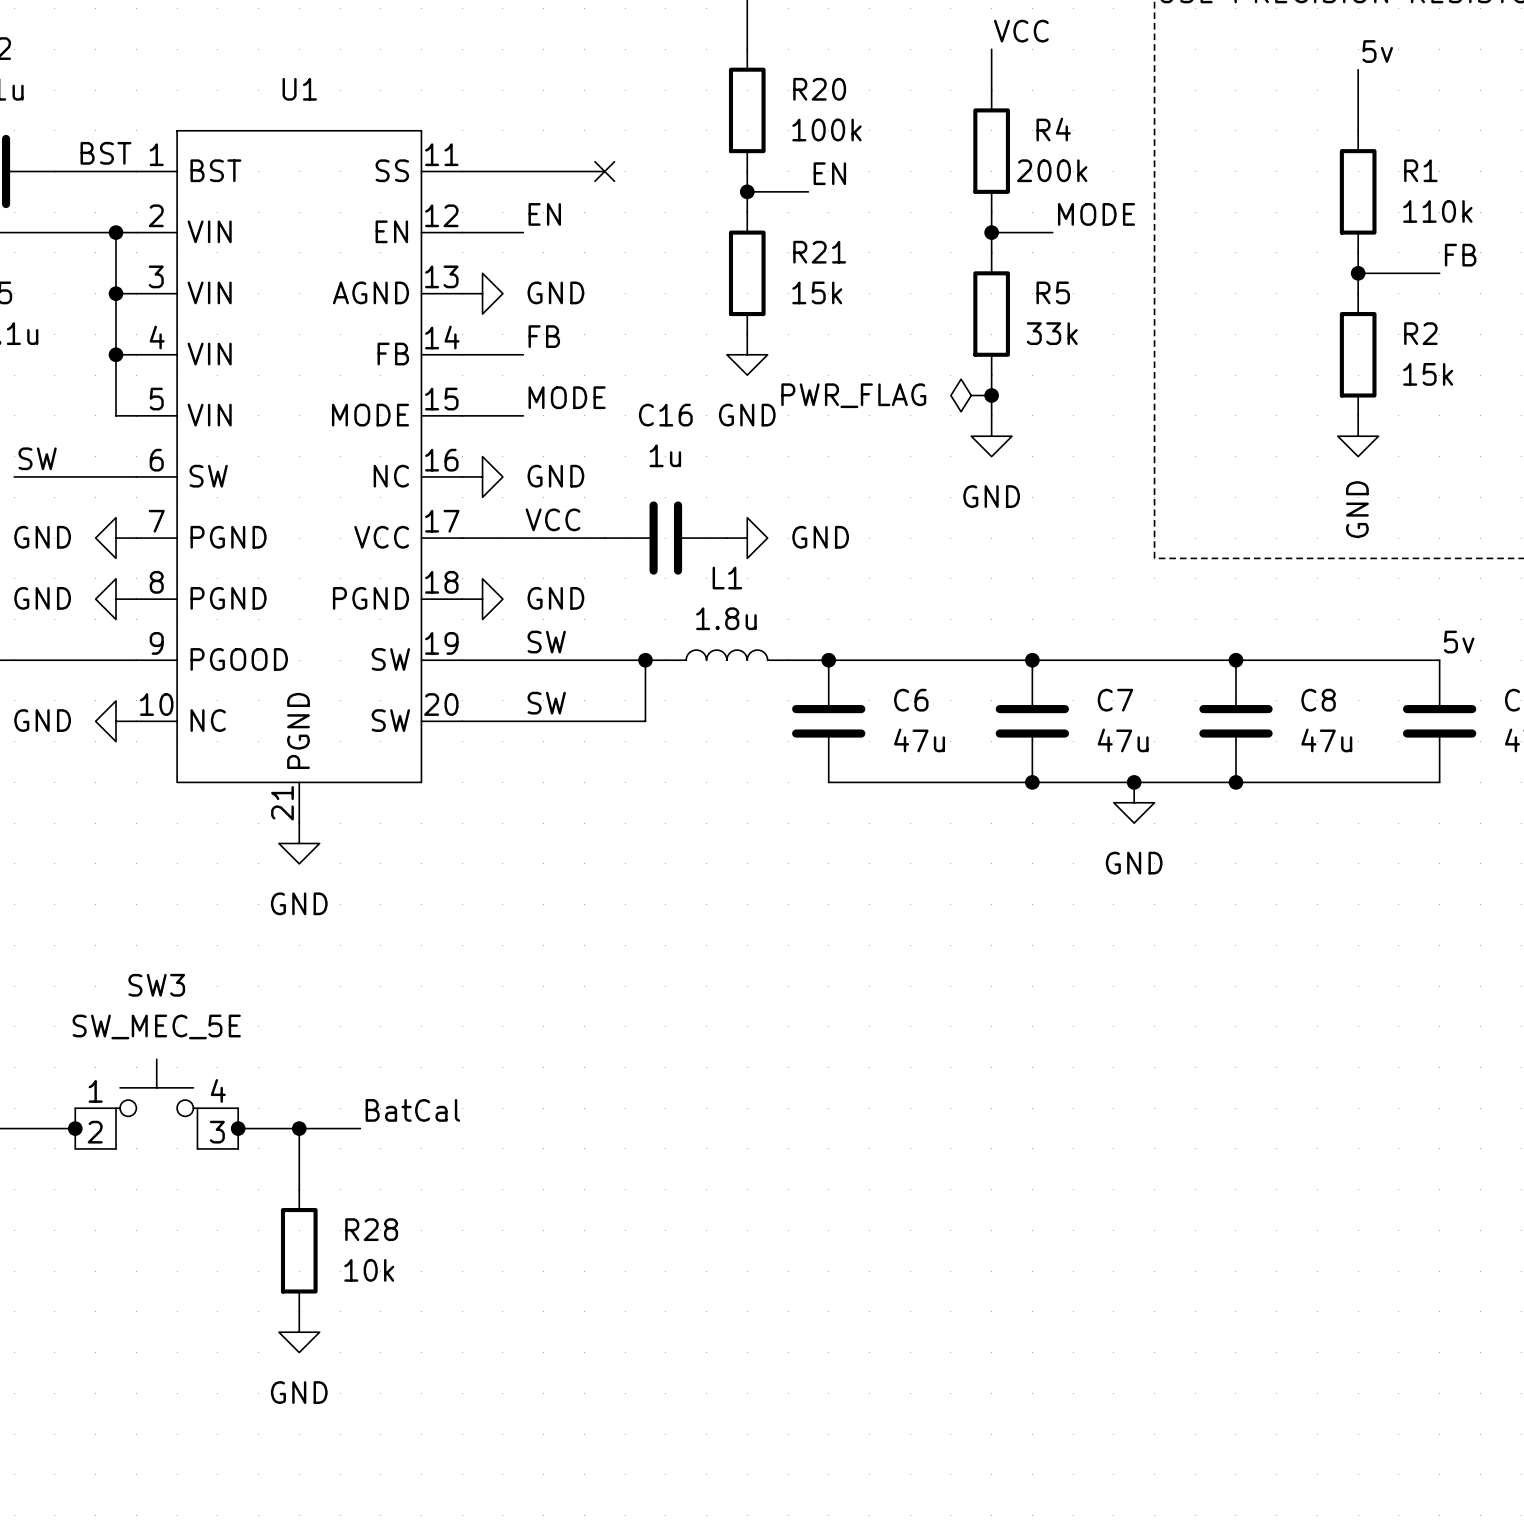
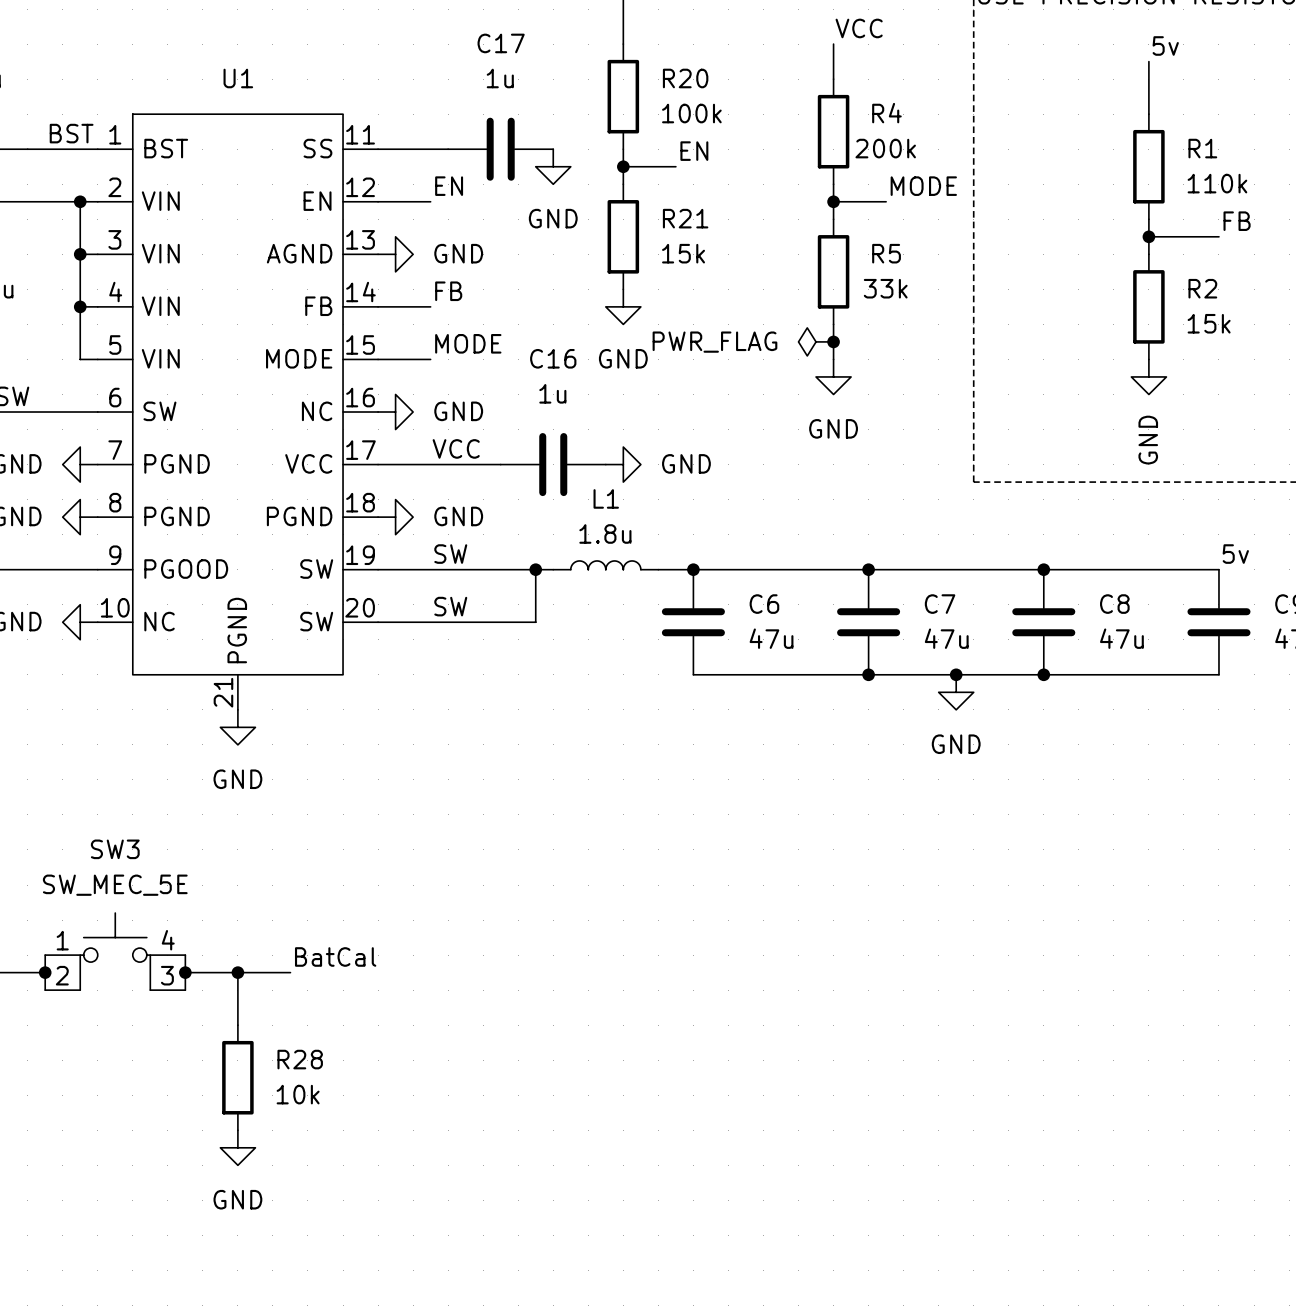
no-connect mark: (604, 171) -> none
C17: none -> 1u (500, 149)
power symbol: none -> GND (553, 166)

